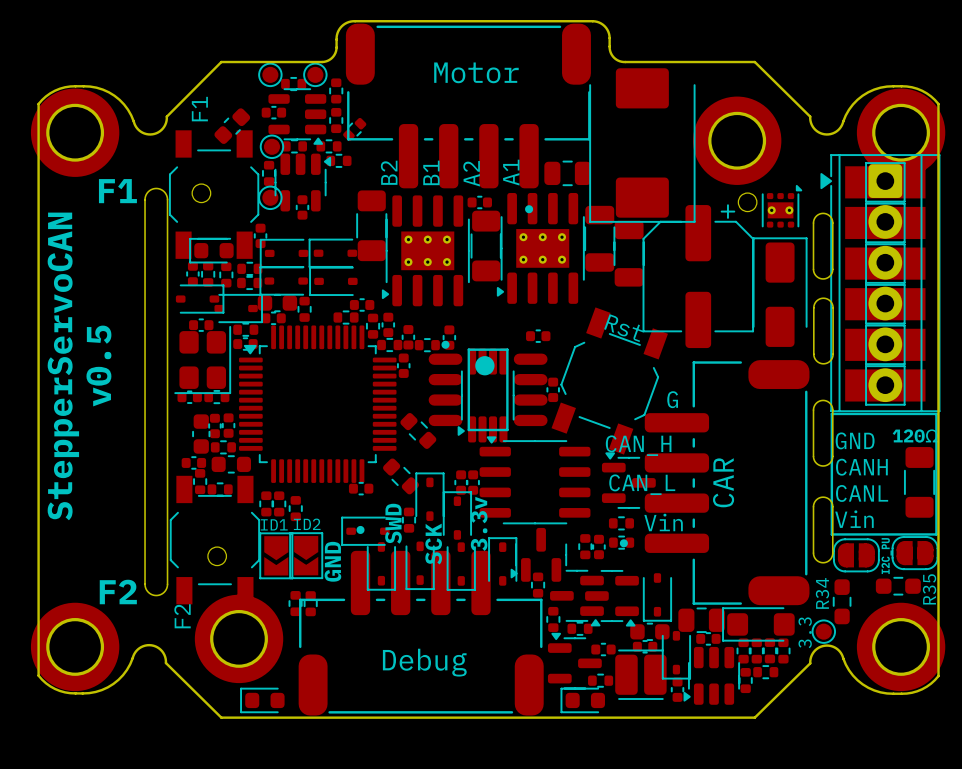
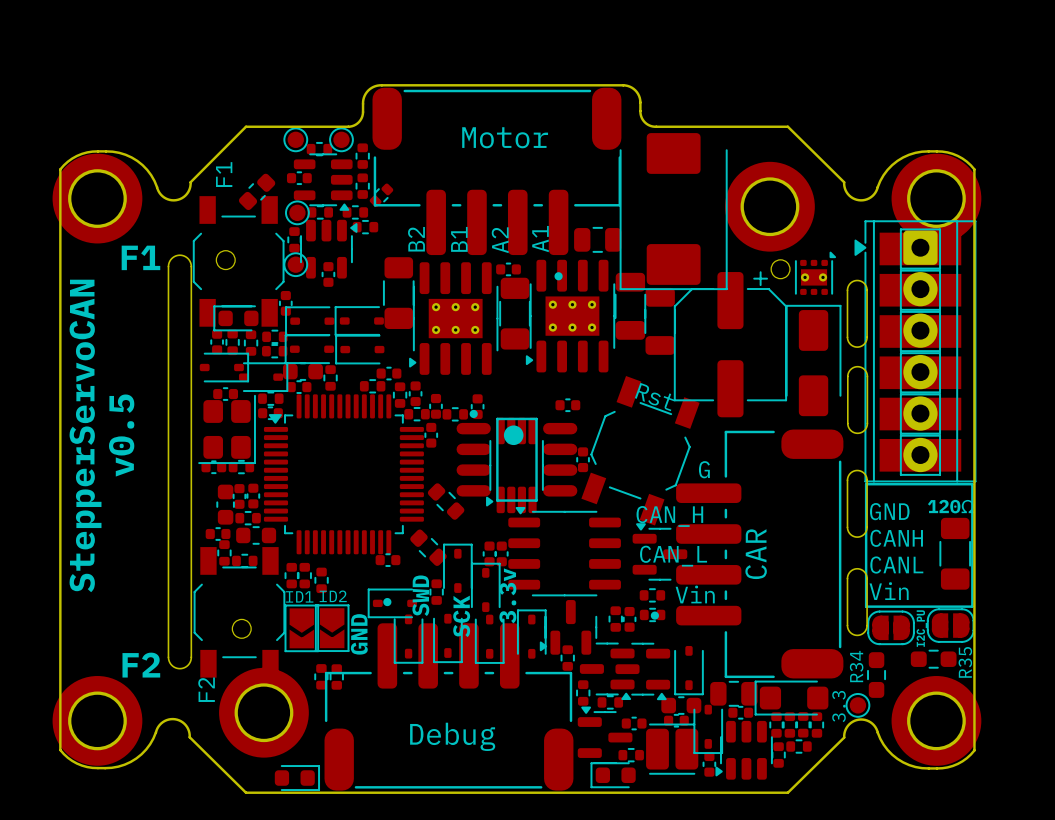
part rotation: 0° (262, 700) -> 180° (297, 778)

